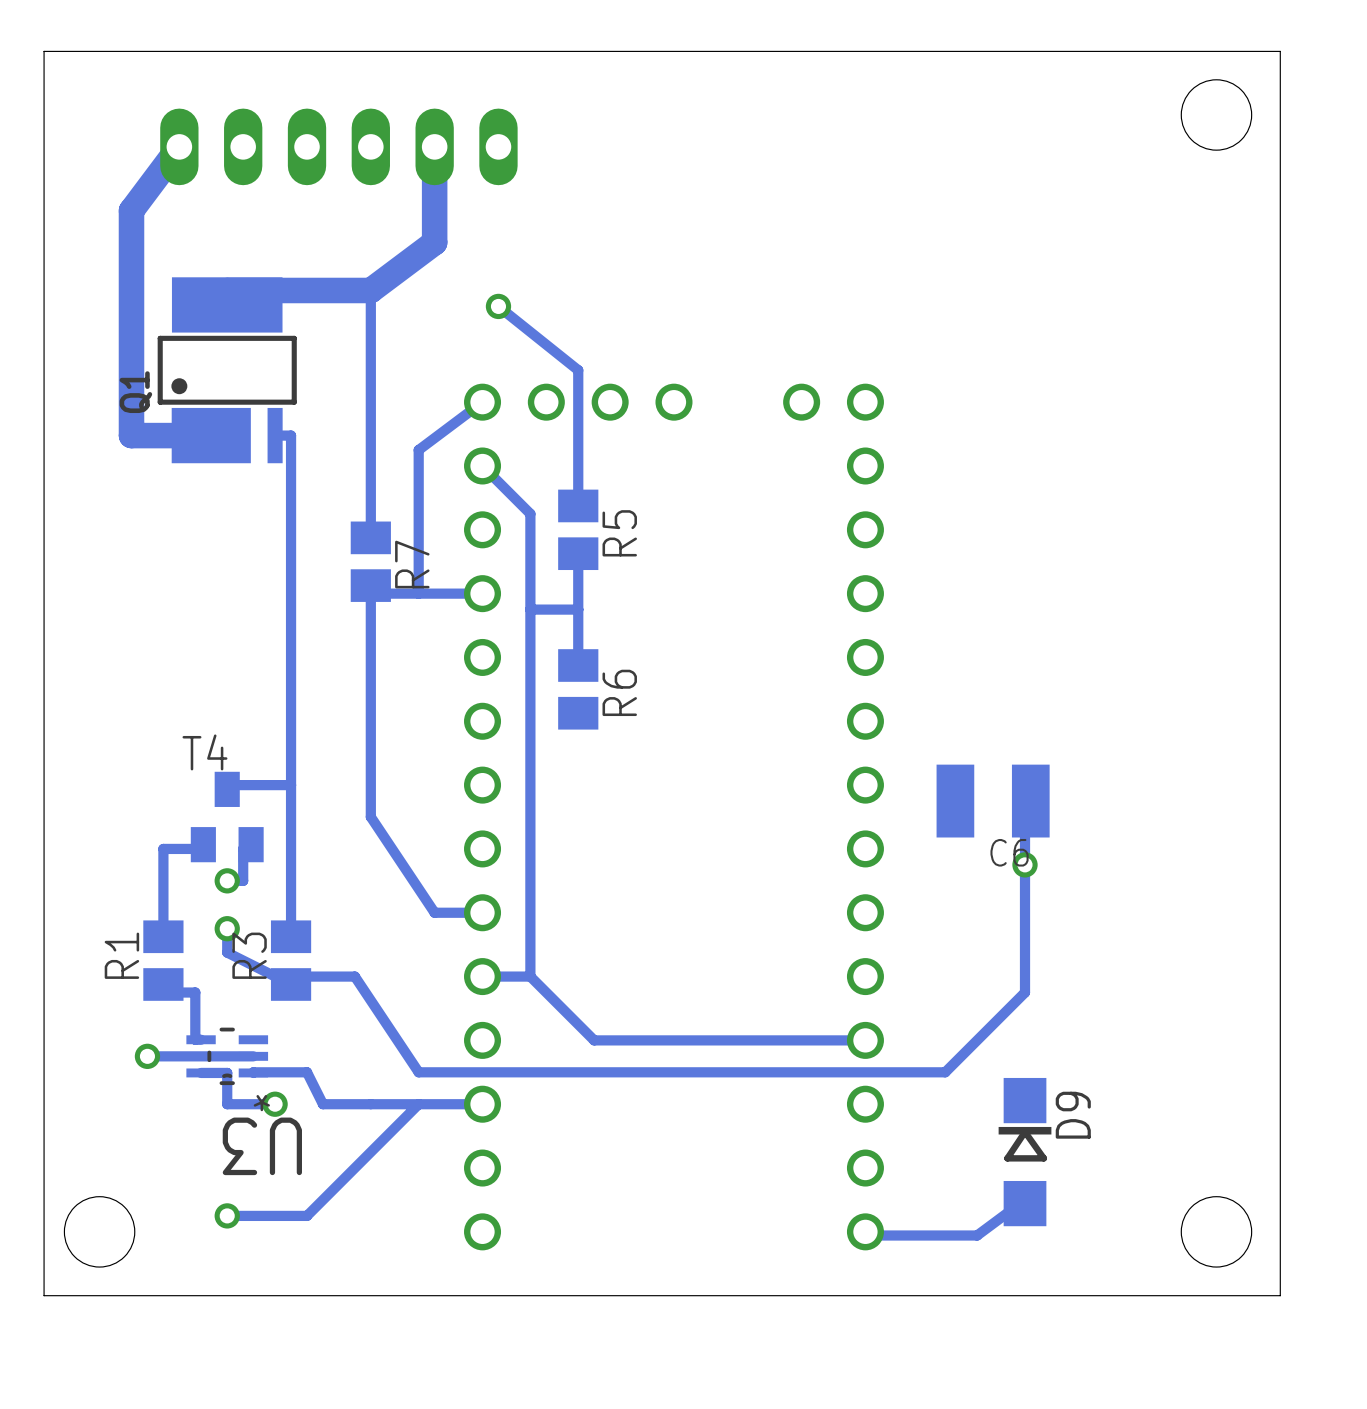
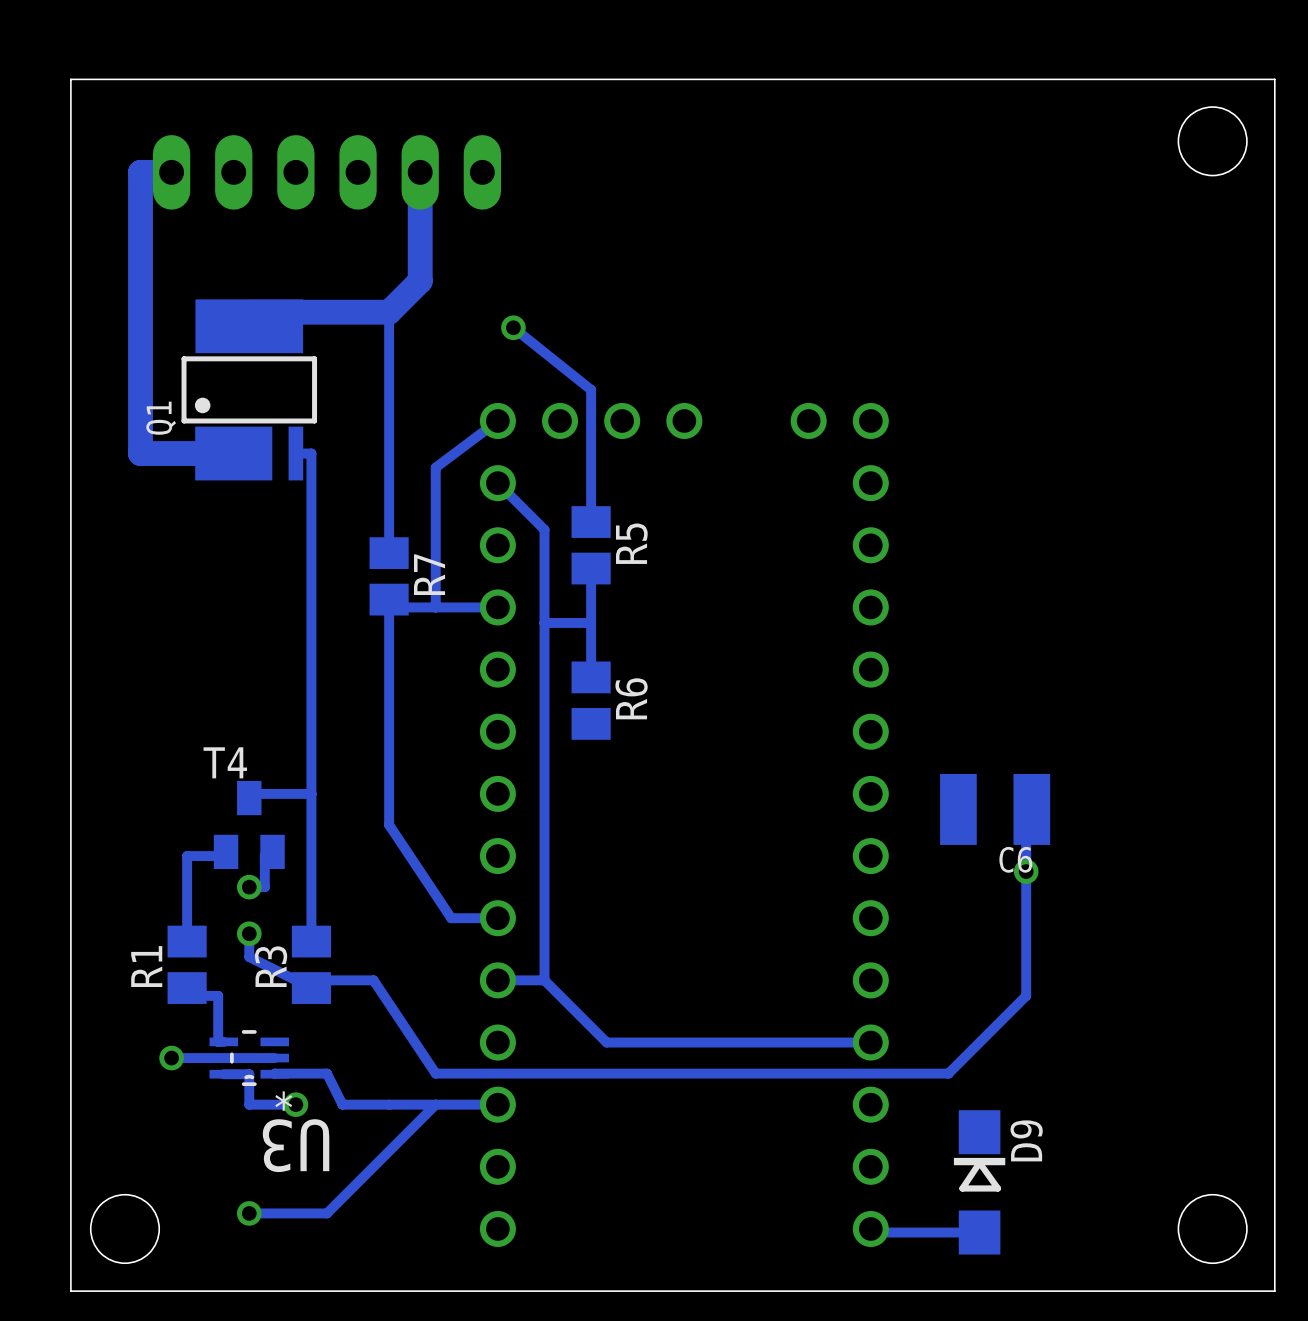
track: (179, 146) (131, 210) (131, 435) -> (171, 172) (140, 172) (140, 453) (156, 453)
part position: (211, 146) -> (202, 172)
part position: (338, 146) -> (326, 172)
track: (434, 146) (434, 242) (370, 290) -> (420, 172) (420, 281) (389, 312)
part position: (466, 146) -> (451, 172)
D9 position: (1025, 1152) -> (979, 1182)
track: (1025, 1203) (1025, 1199) (977, 1235) -> none

